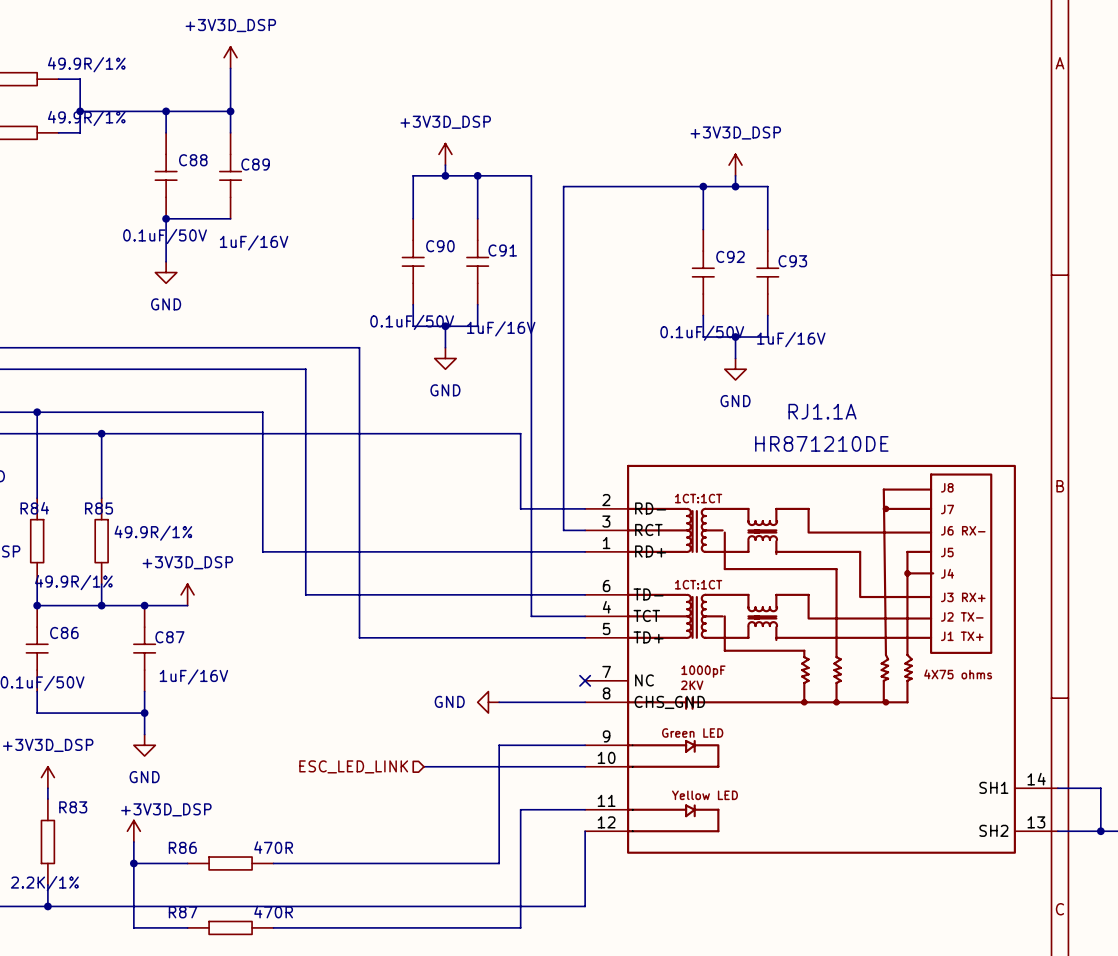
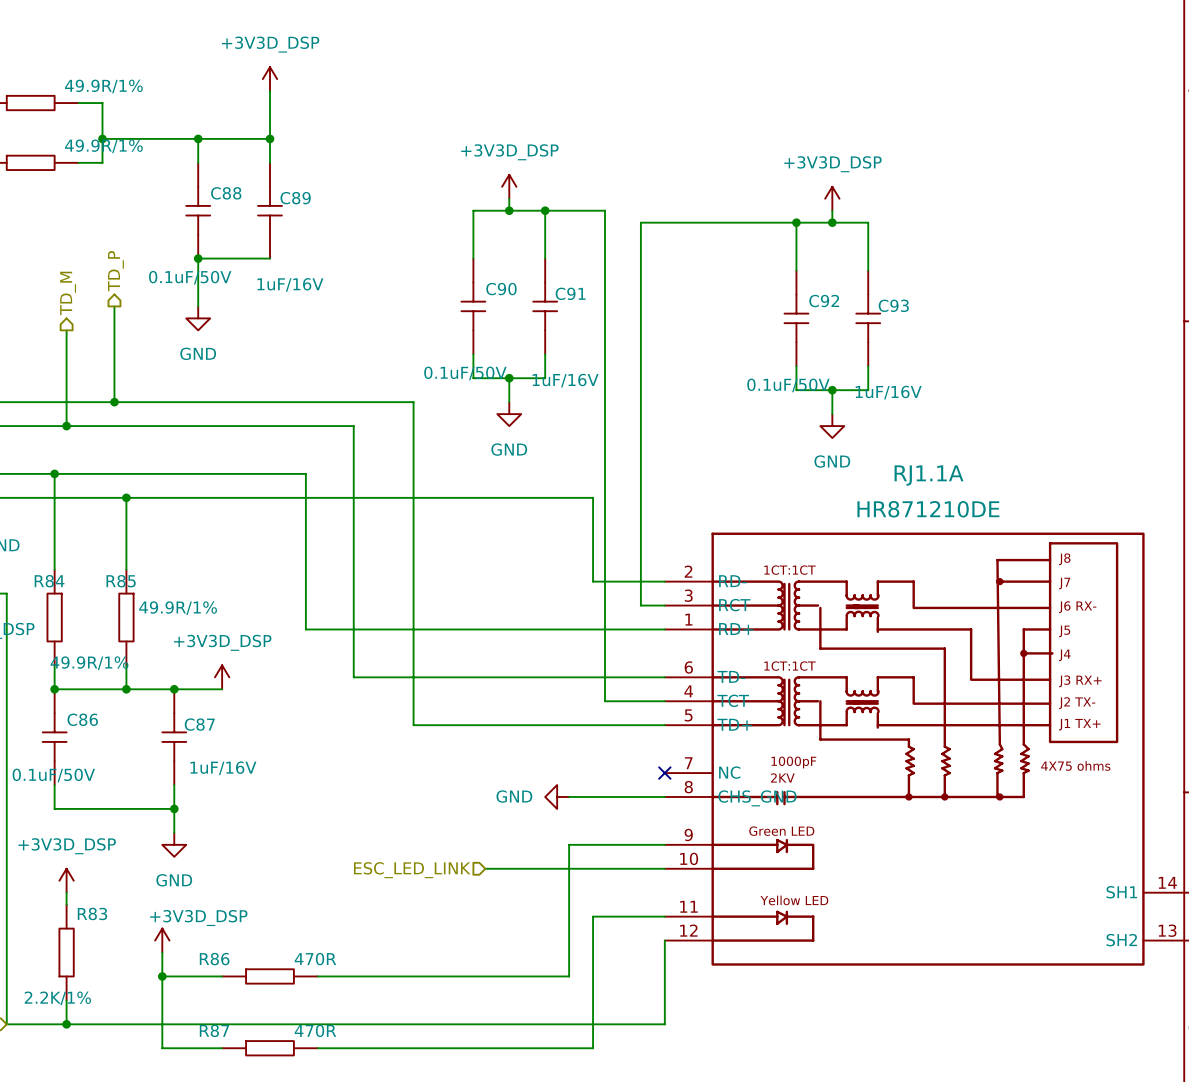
hierarchical label: none -> TD_P (115, 271)
hierarchical label: none -> TD_M (68, 293)
wire: none -> (114, 306) (114, 402)
wire: none -> (66, 330) (66, 426)
junction: none -> (114, 402)
junction: none -> (66, 426)

